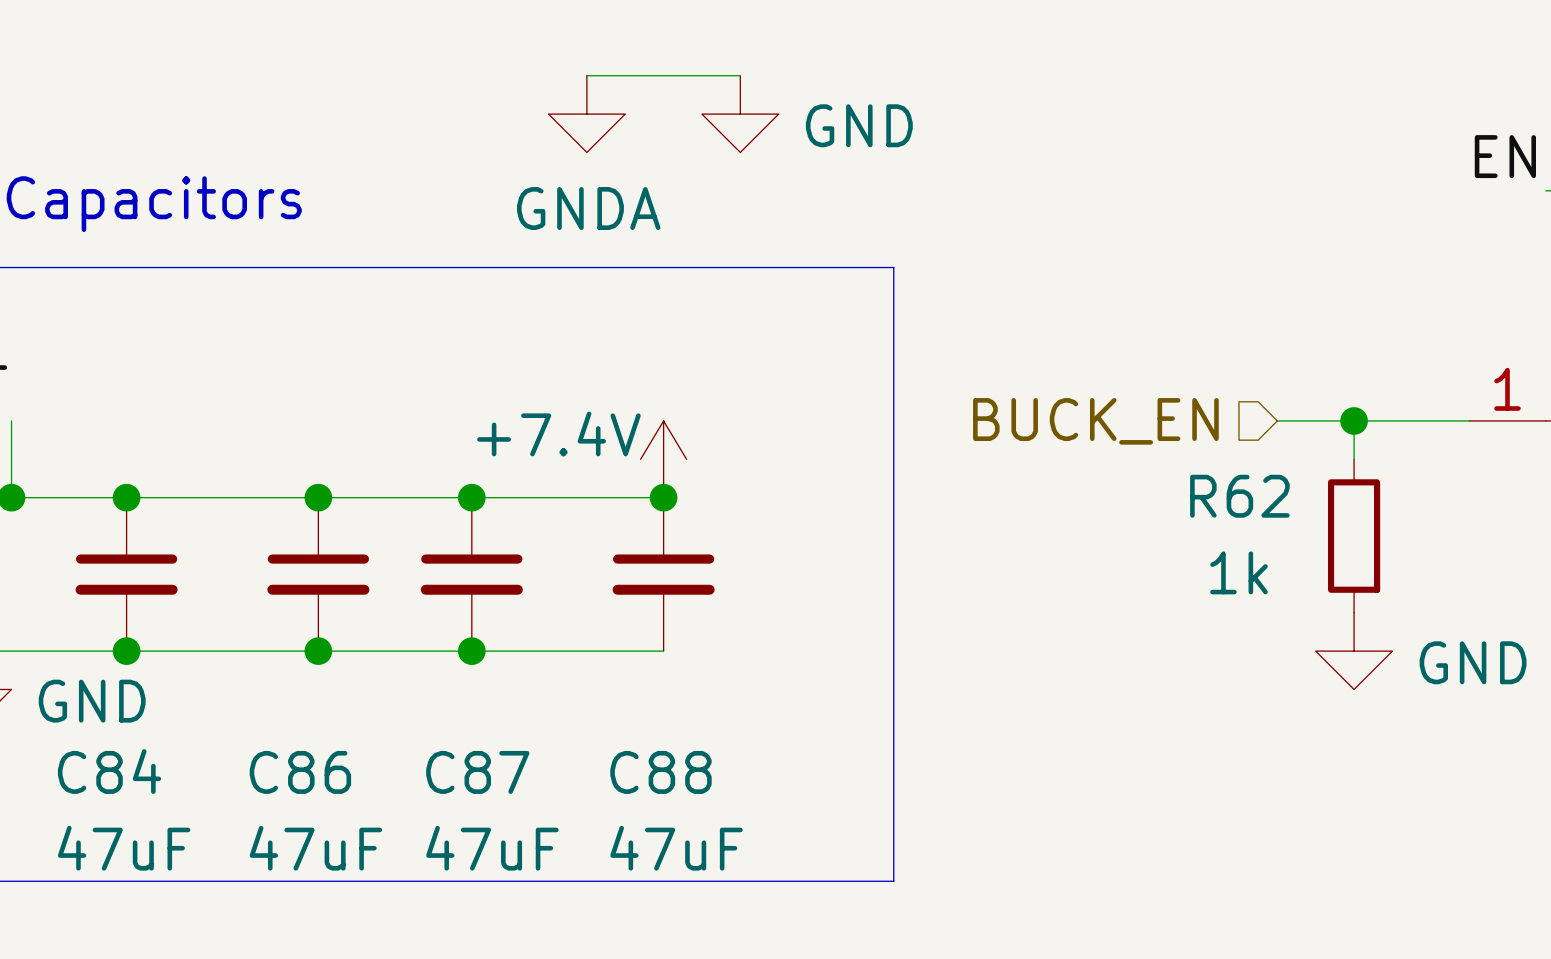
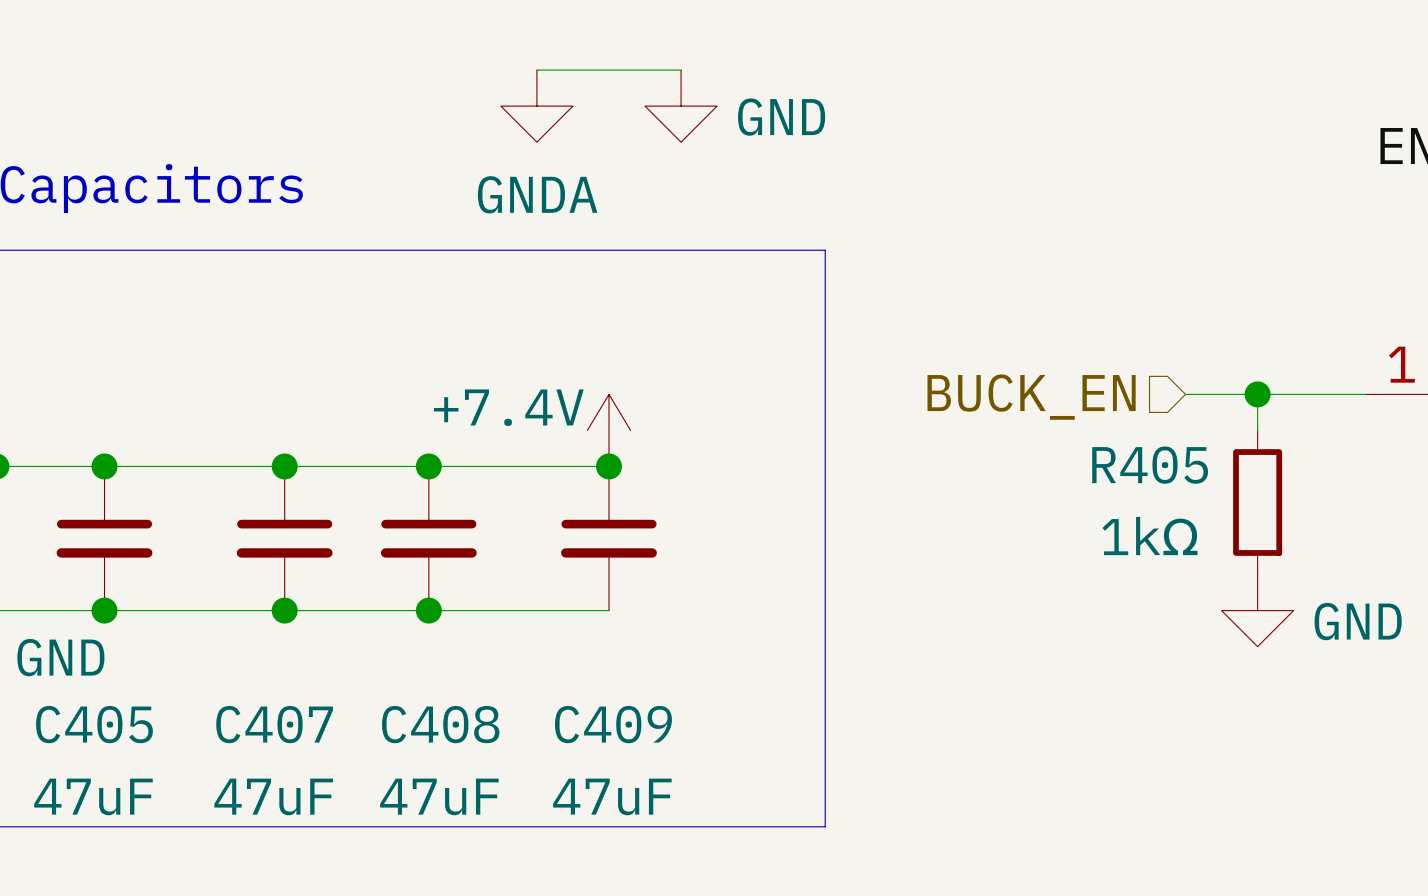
R62 name: R62 (1239, 496) -> R405 (1150, 465)
R62 value: 1k (1238, 572) -> 1kΩ (1149, 536)
C84 name: C84 (109, 771) -> C405 (94, 724)
C86 name: C86 (300, 772) -> C407 (274, 724)
C87 name: C87 (477, 772) -> C408 (440, 724)
C88 name: C88 (660, 772) -> C409 (613, 724)

